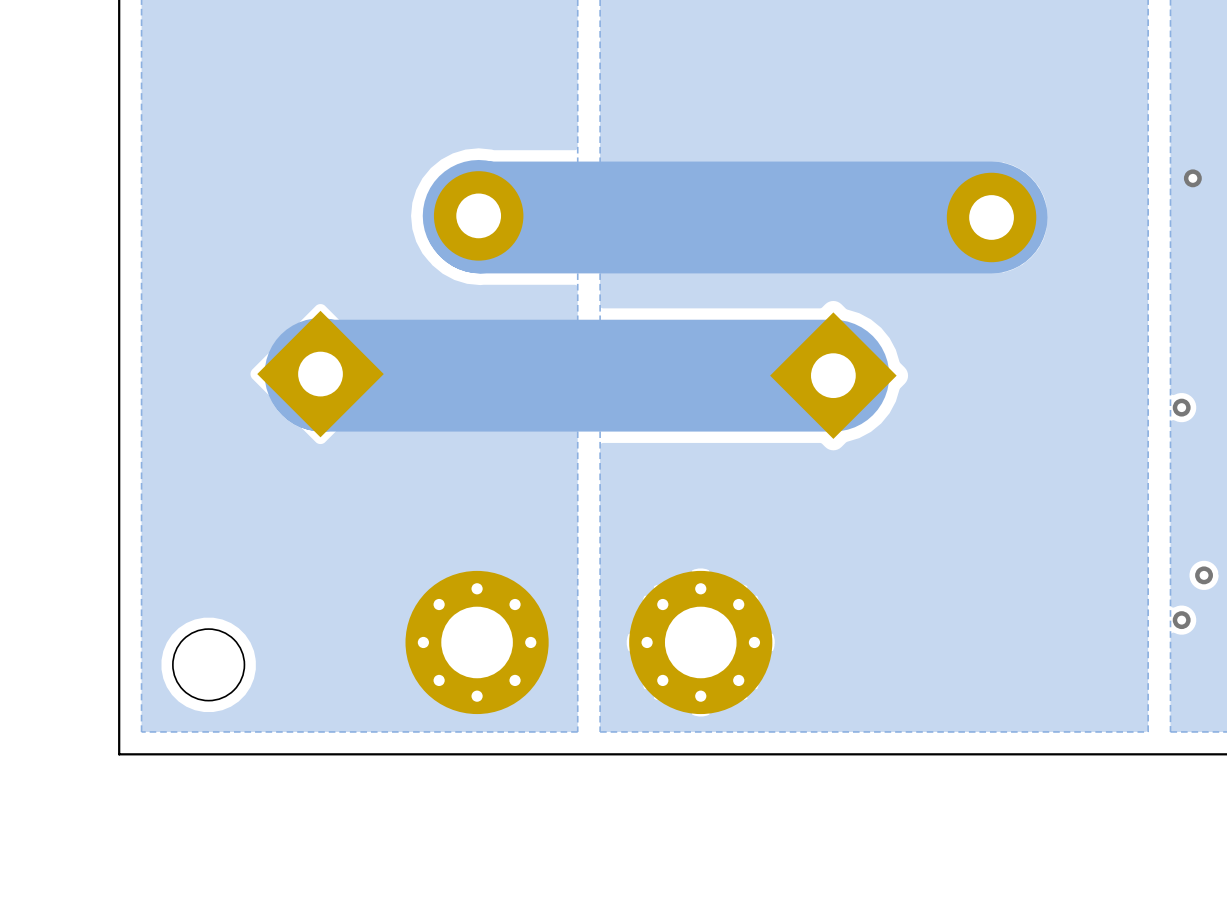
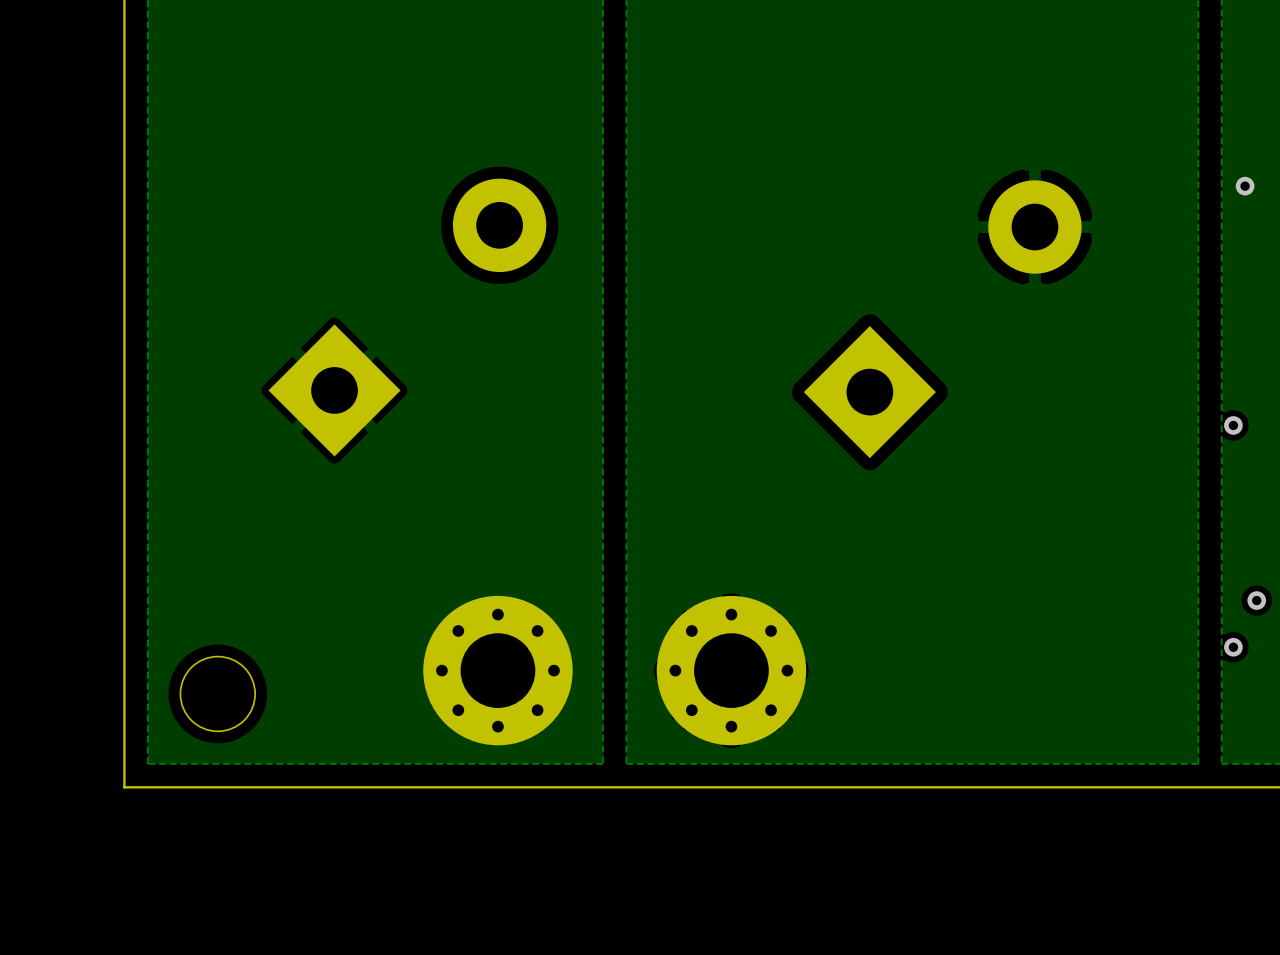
track: (478, 215) (480, 217) (991, 217) -> none
track: (320, 374) (322, 375) (833, 375) -> none

